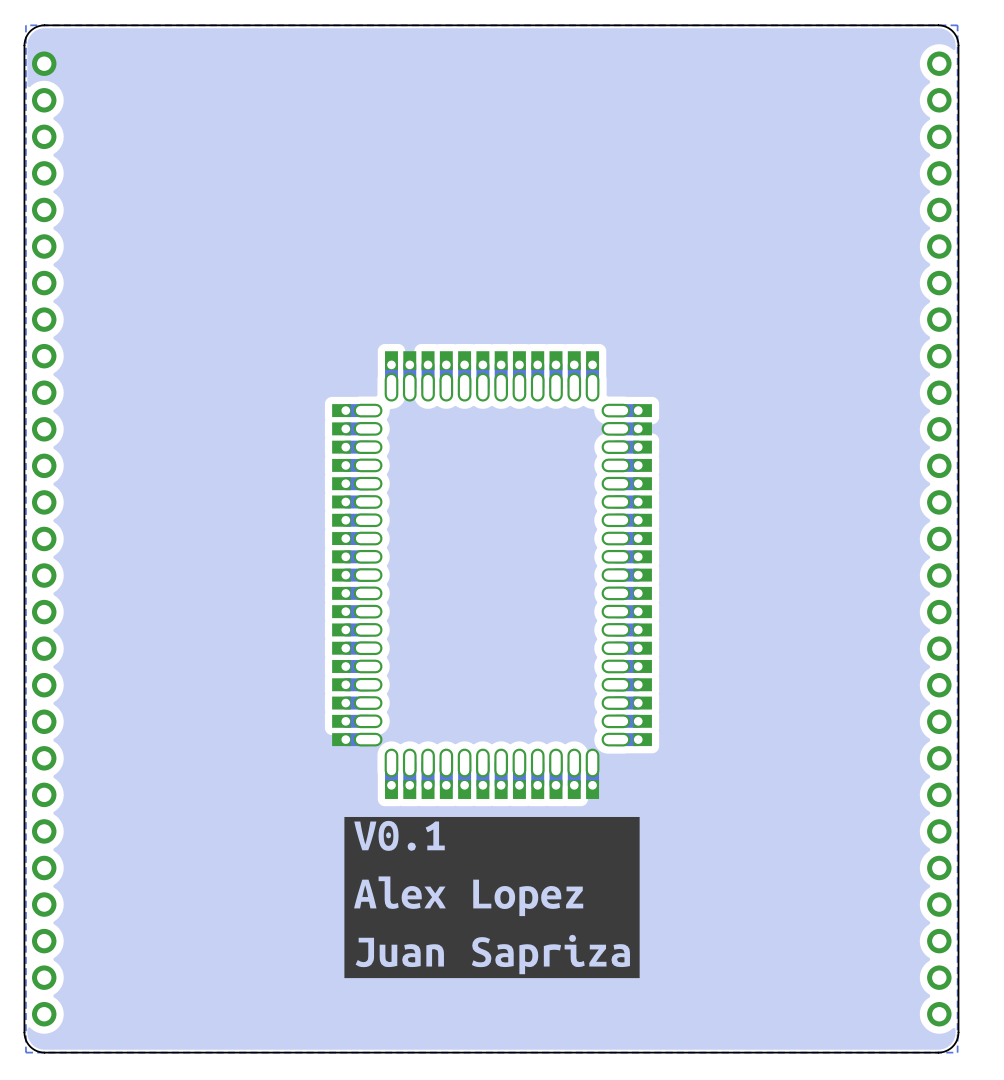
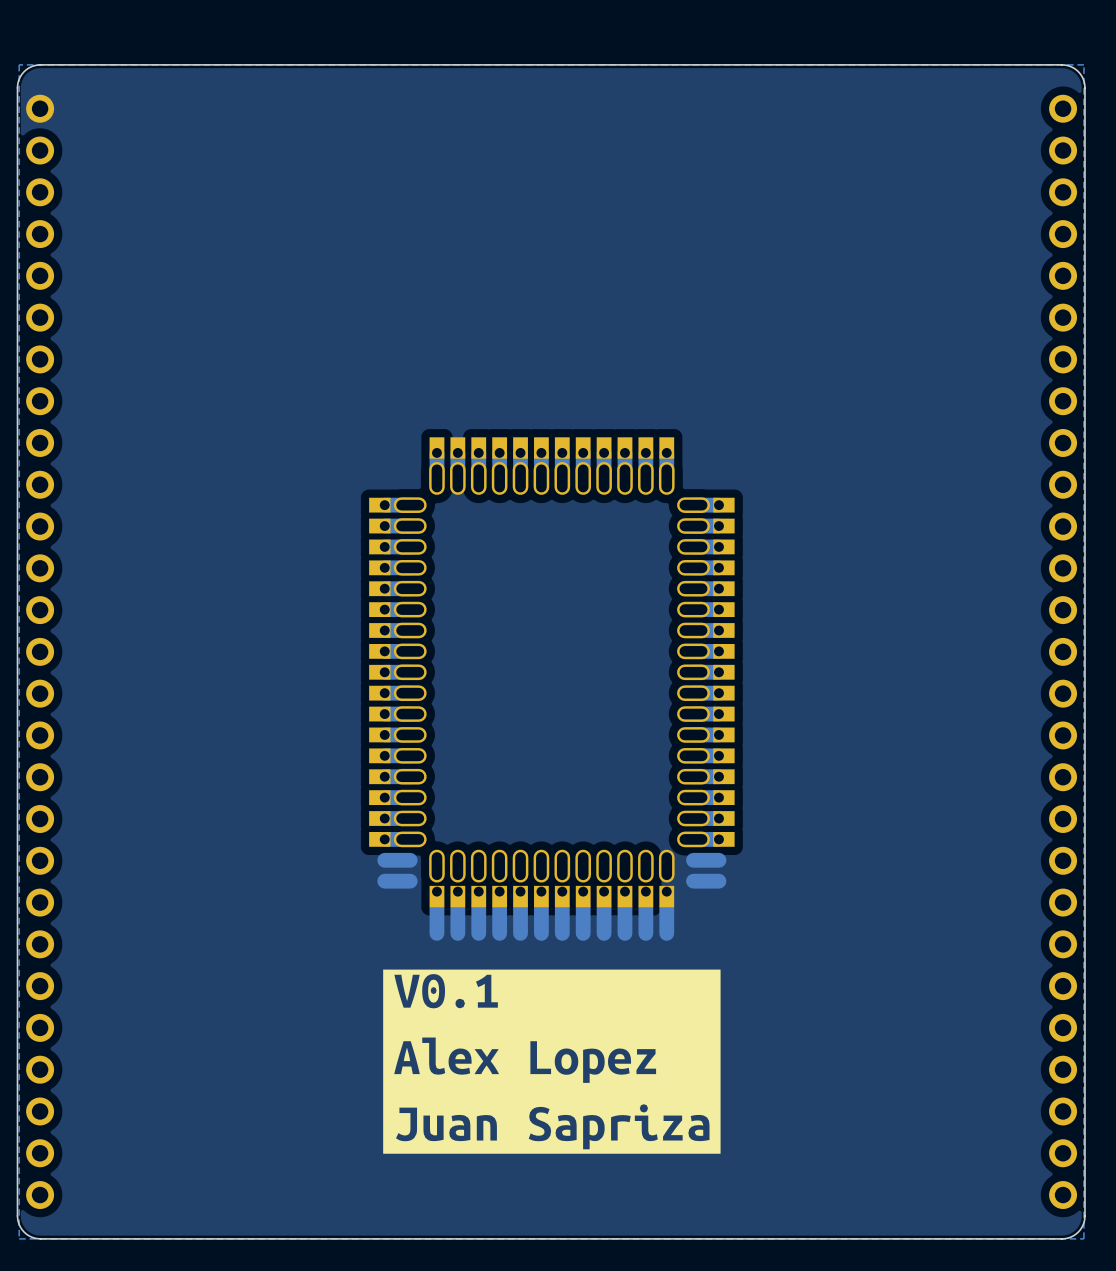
part: none -> (551, 672)
part: (492, 575) -> none

